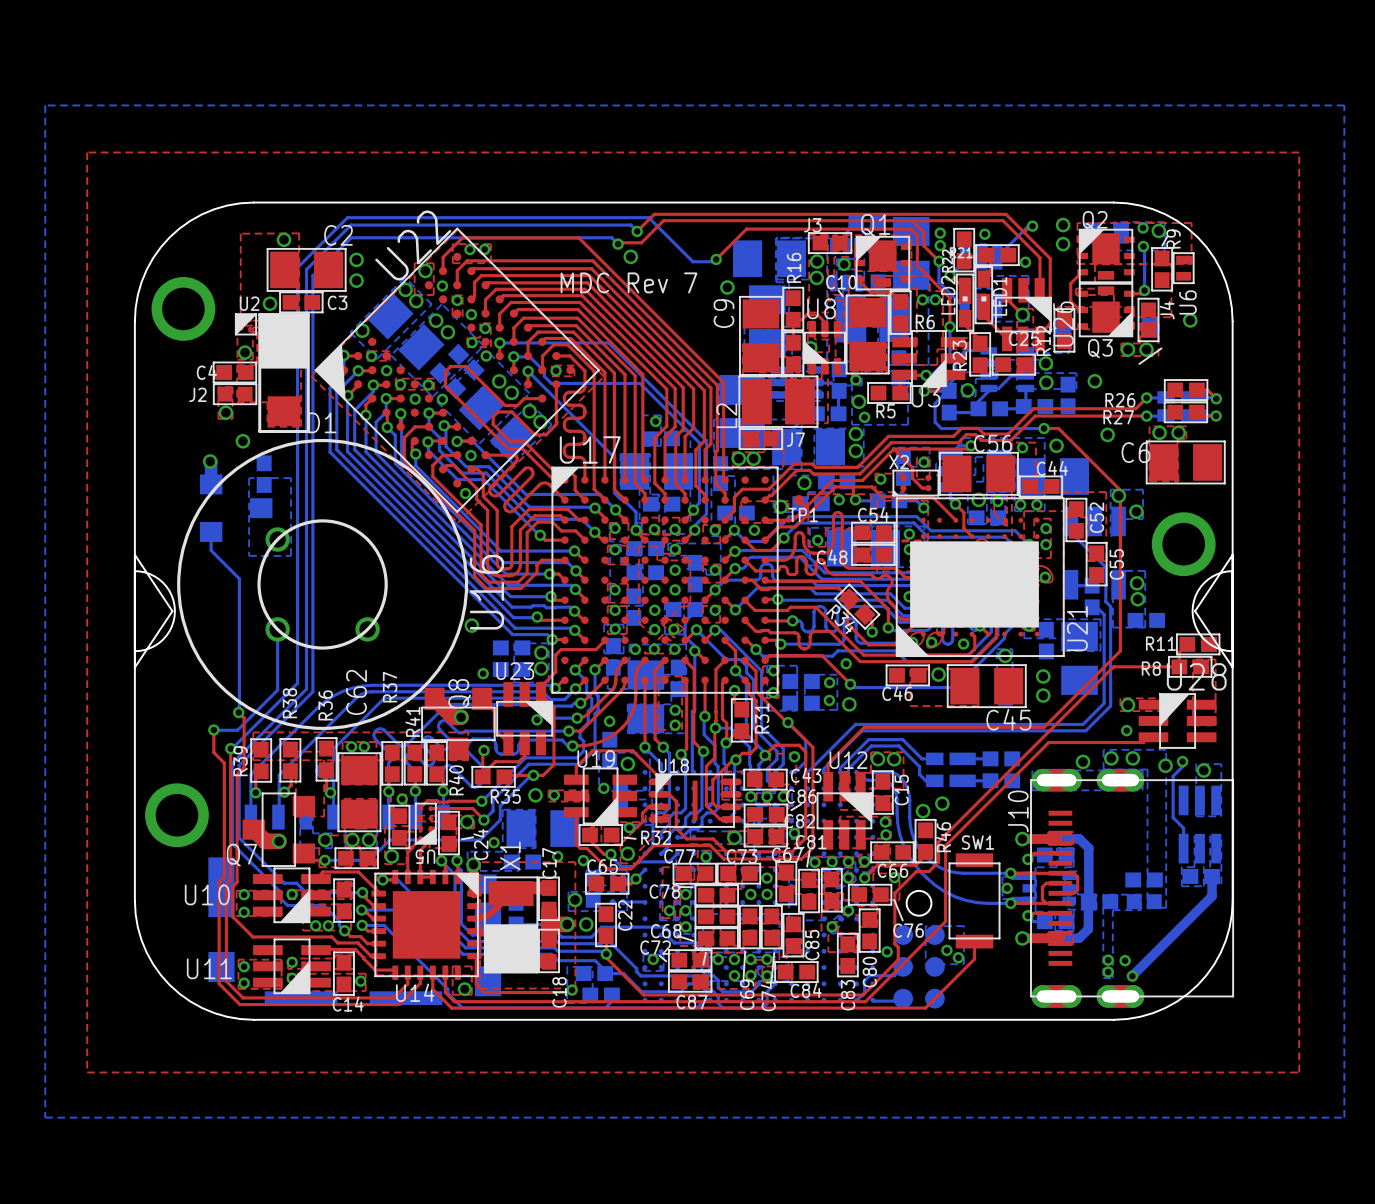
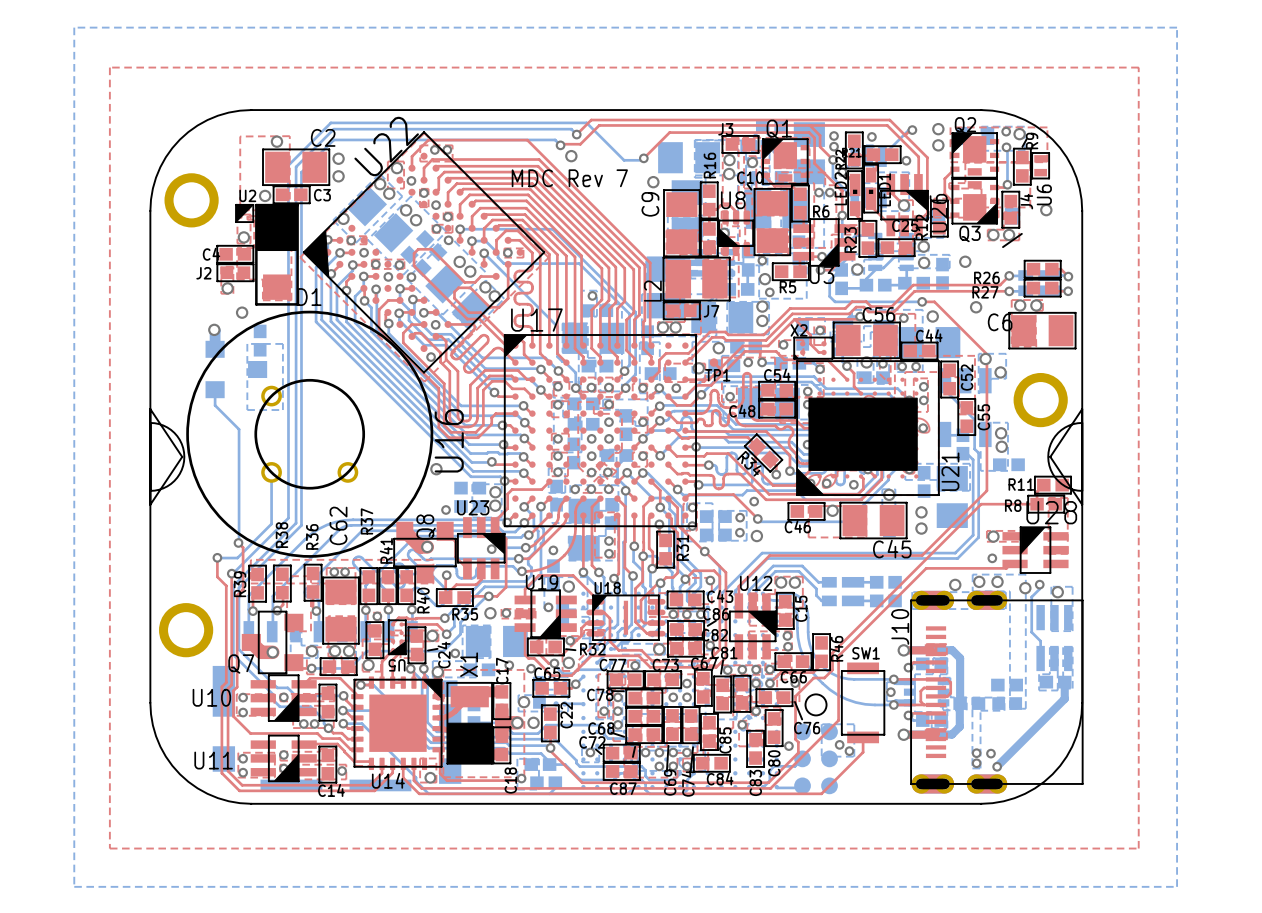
via: (942, 803) -> none
via: (923, 811) -> none

